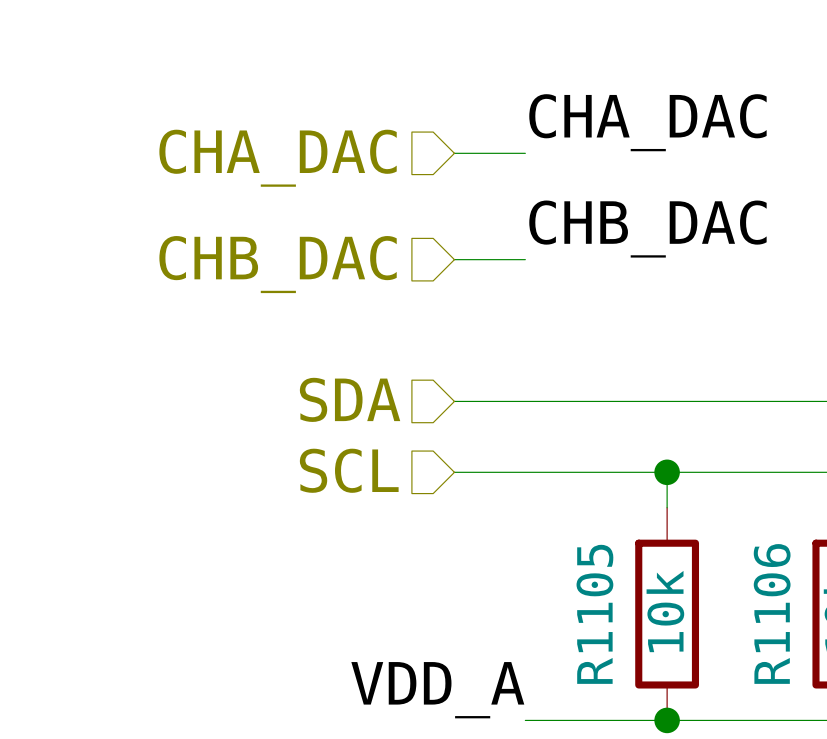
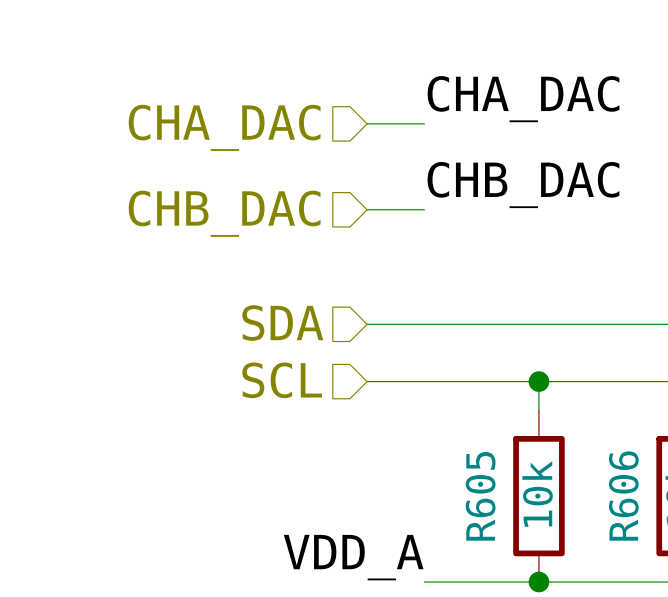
R1106 name: R1106 (772, 613) -> R606 (623, 496)
R1105 name: R1105 (594, 614) -> R605 (480, 496)

